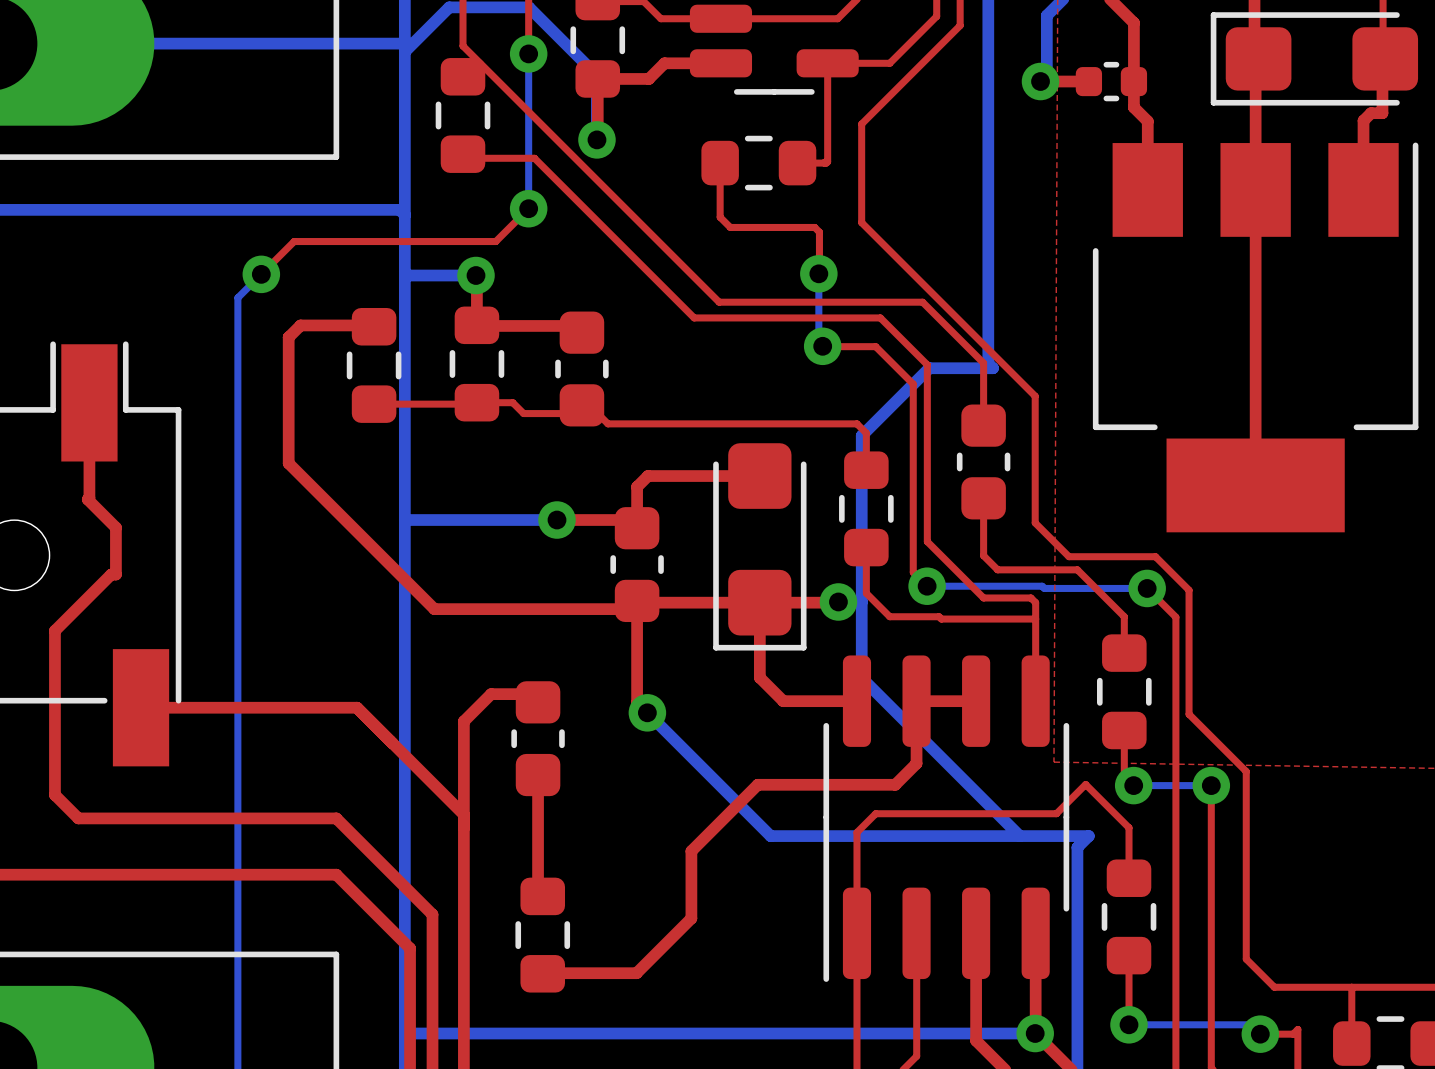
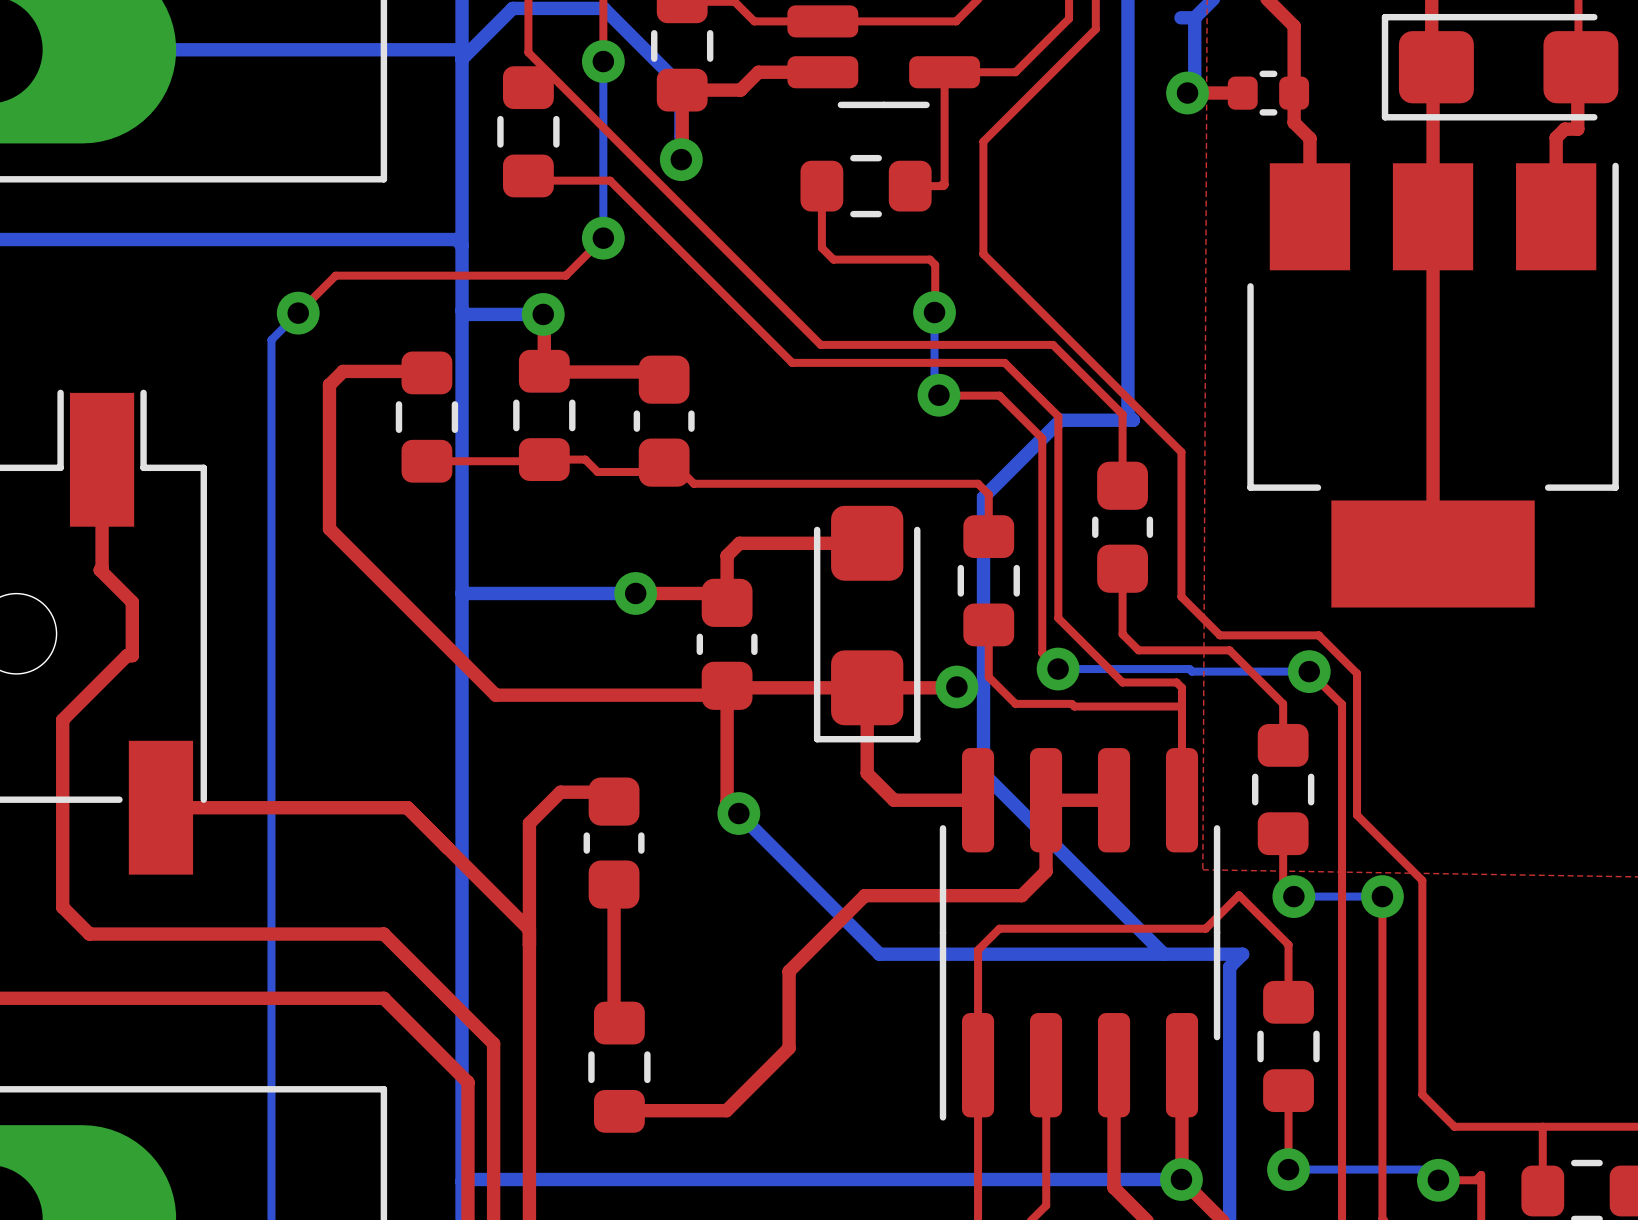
bottom track: none -> (1180, 17) (1194, 17)

